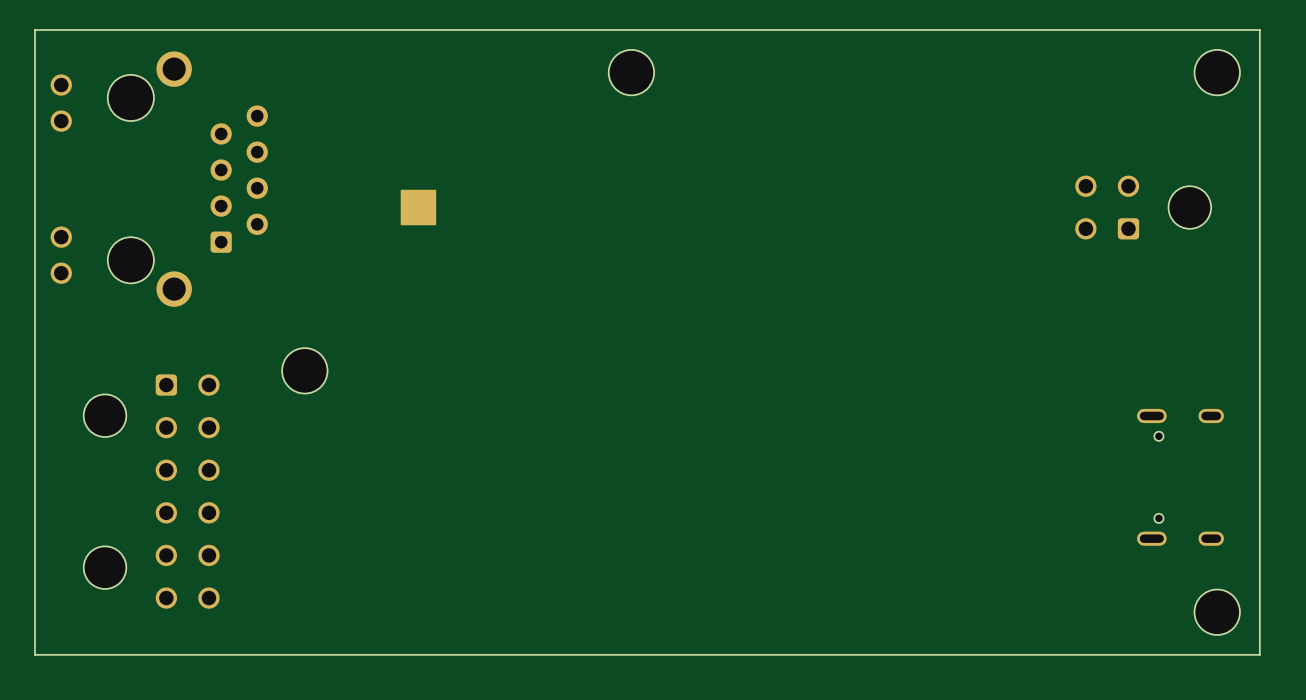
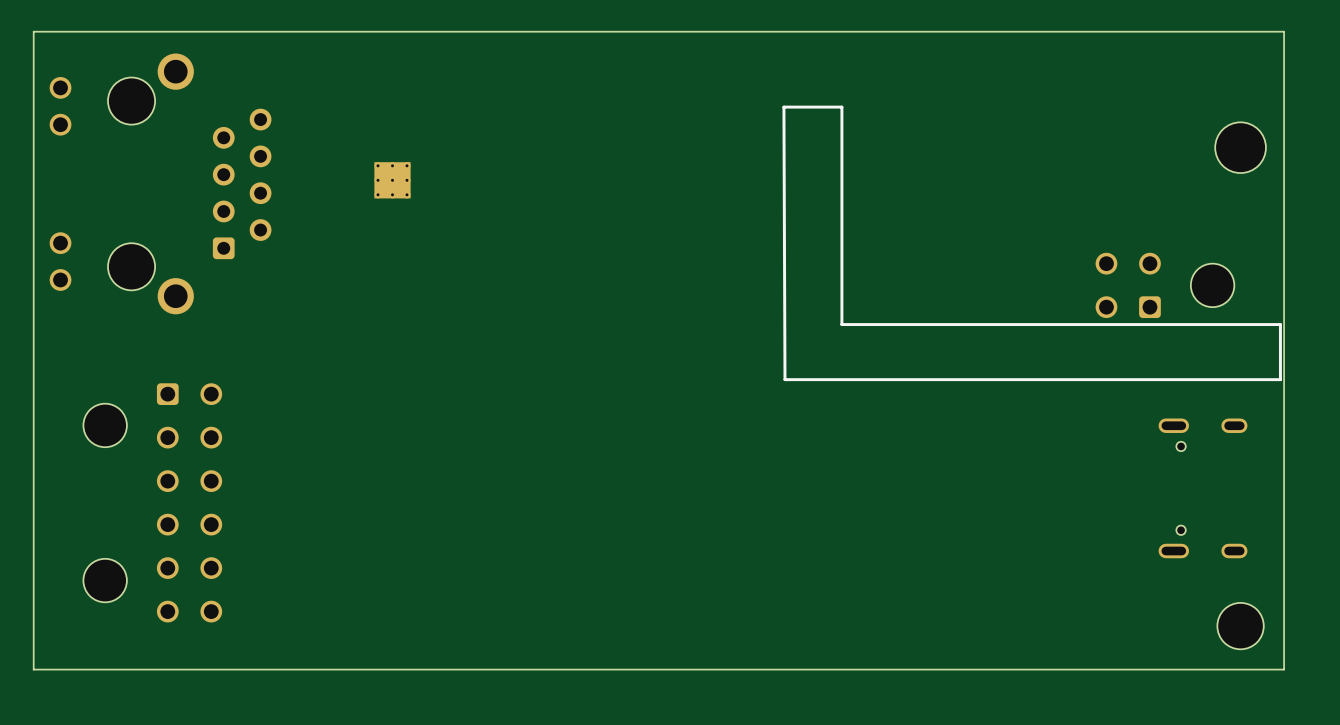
part: (631, 72) -> none
part: (1217, 72) -> none
line: none -> (841, 107) (783, 107) (784, 379) (1280, 379) (1280, 324) (841, 324) (841, 107)
part: none -> (1240, 147)
part: none -> (392, 180)
part: (418, 207) -> none
part position: (1143, 207) -> (1164, 285)
part: (304, 370) -> none

